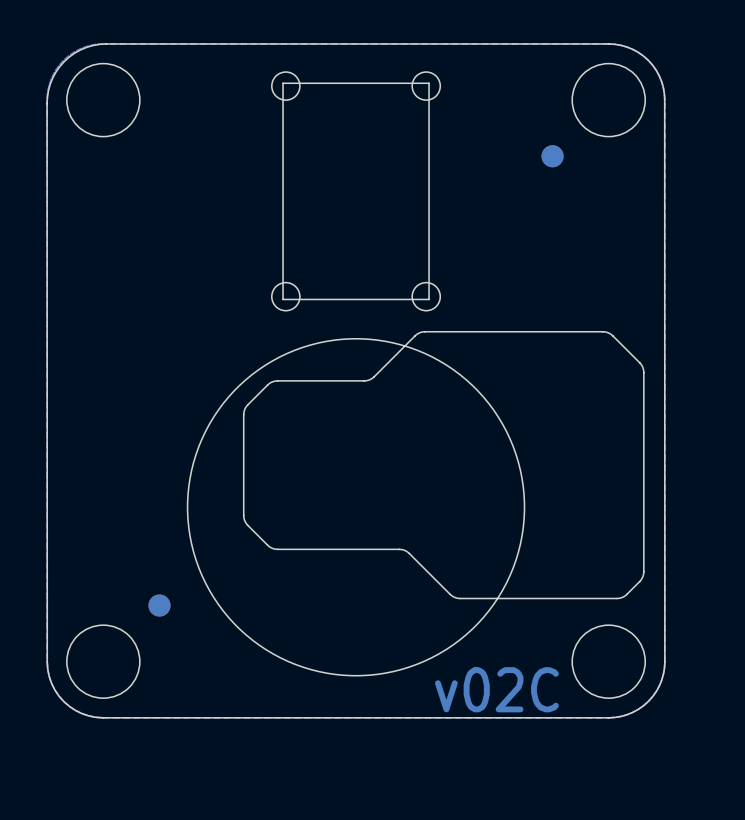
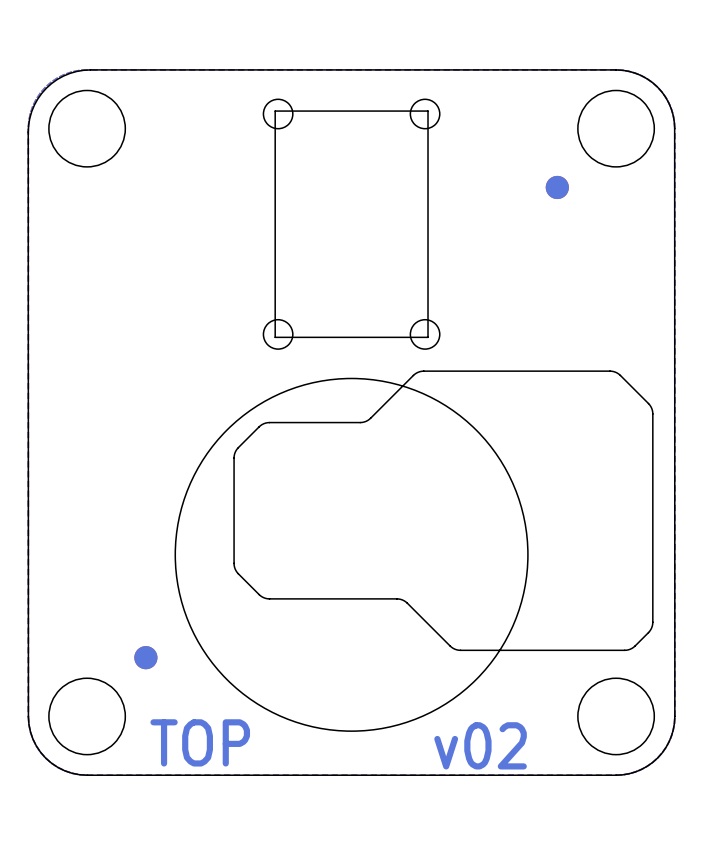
text: none -> TOP (200, 742)
text: v02C (496, 689) -> v02 (480, 745)

